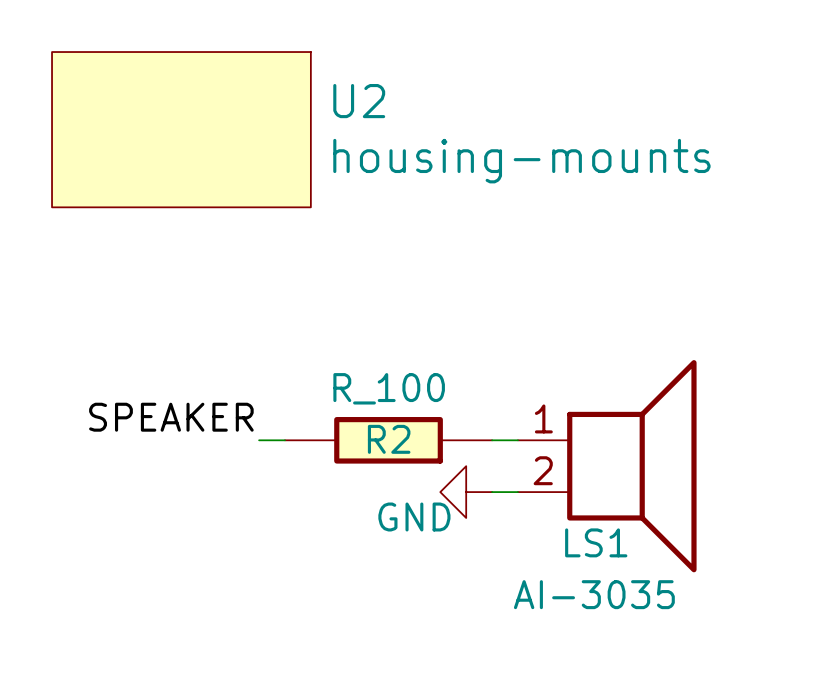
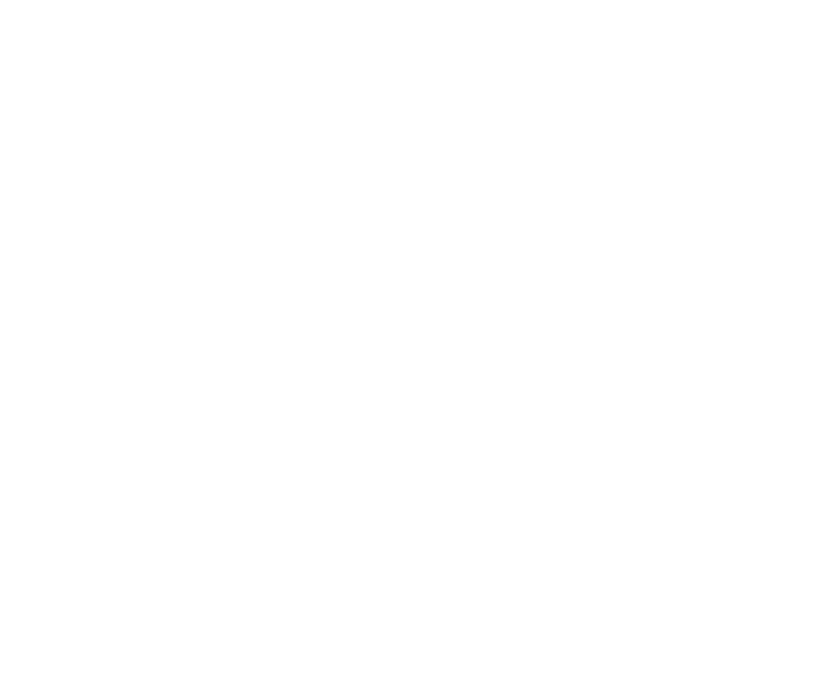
U2: housing-mounts (181, 129) -> none
label: SPEAKER (171, 417) -> none
wire: (259, 440) (284, 440) -> none
R2: R_100 (388, 440) -> none
wire: (492, 440) (517, 440) -> none
LS1: AI-3035 (607, 466) -> none
power symbol: GND (466, 492) -> none
wire: (492, 492) (517, 492) -> none

